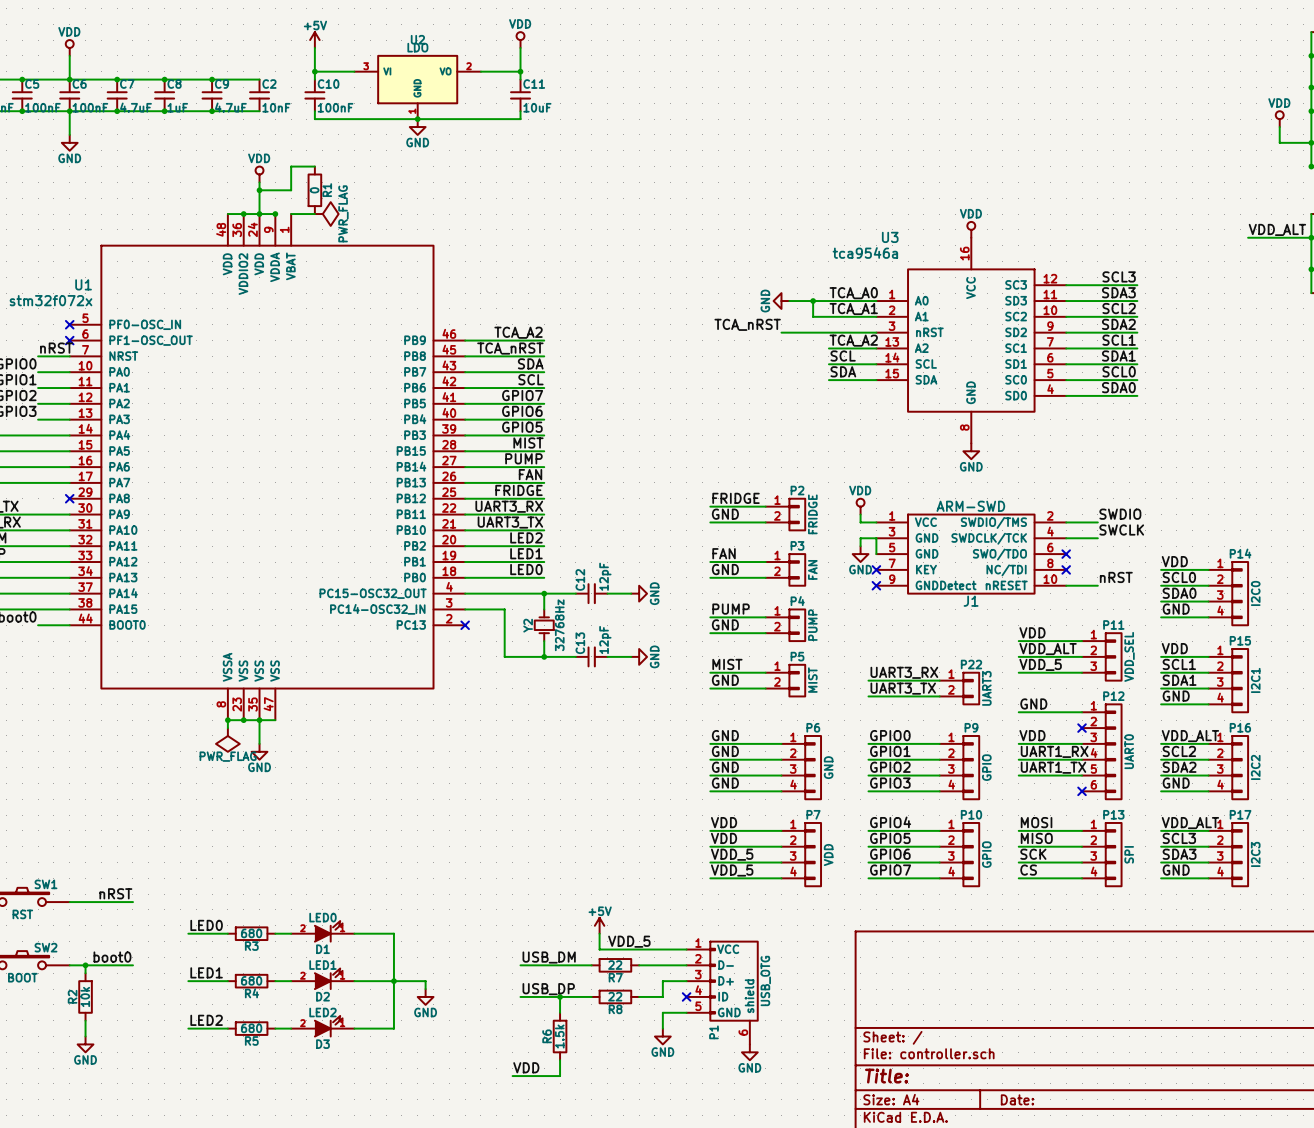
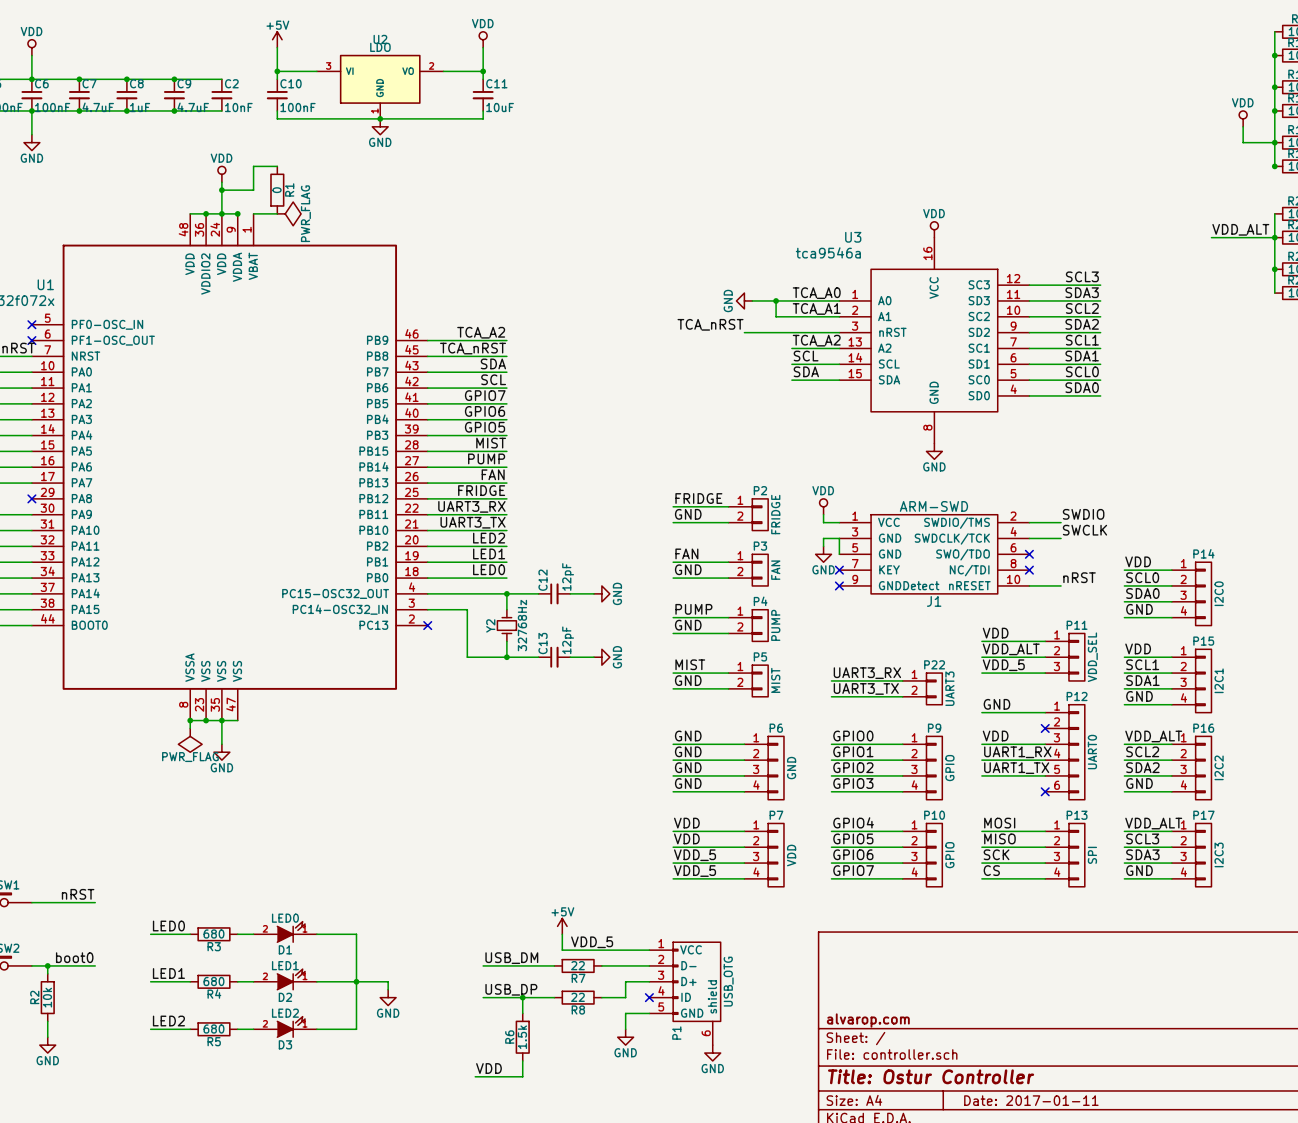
title block: none -> alvarop.com (868, 1020)
title block: Title: (886, 1076) -> Title: Ostur Controller (931, 1076)
title block: Date: (1017, 1099) -> Date: 2017-01-11 (1031, 1100)

